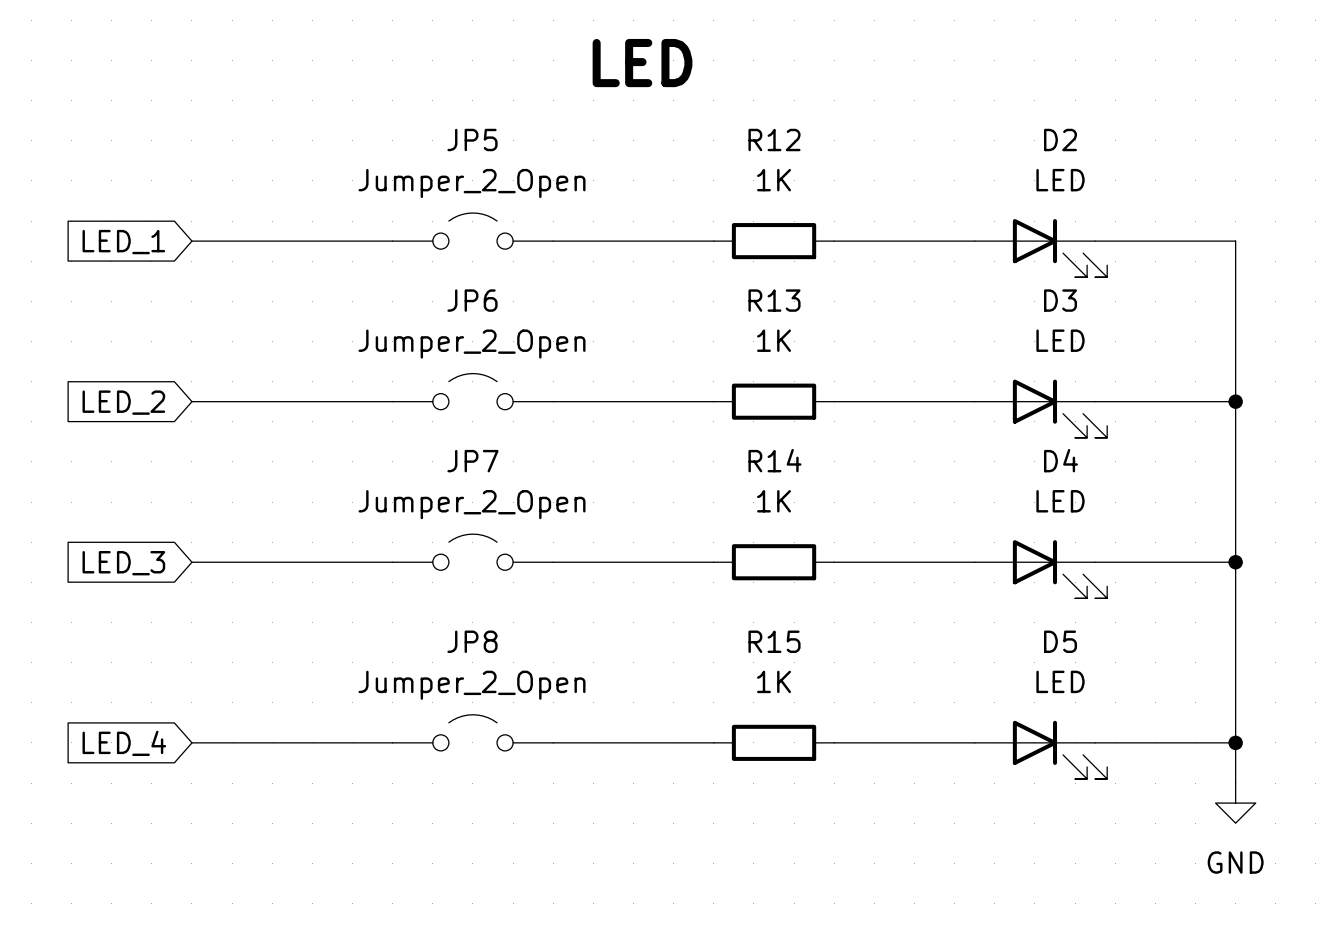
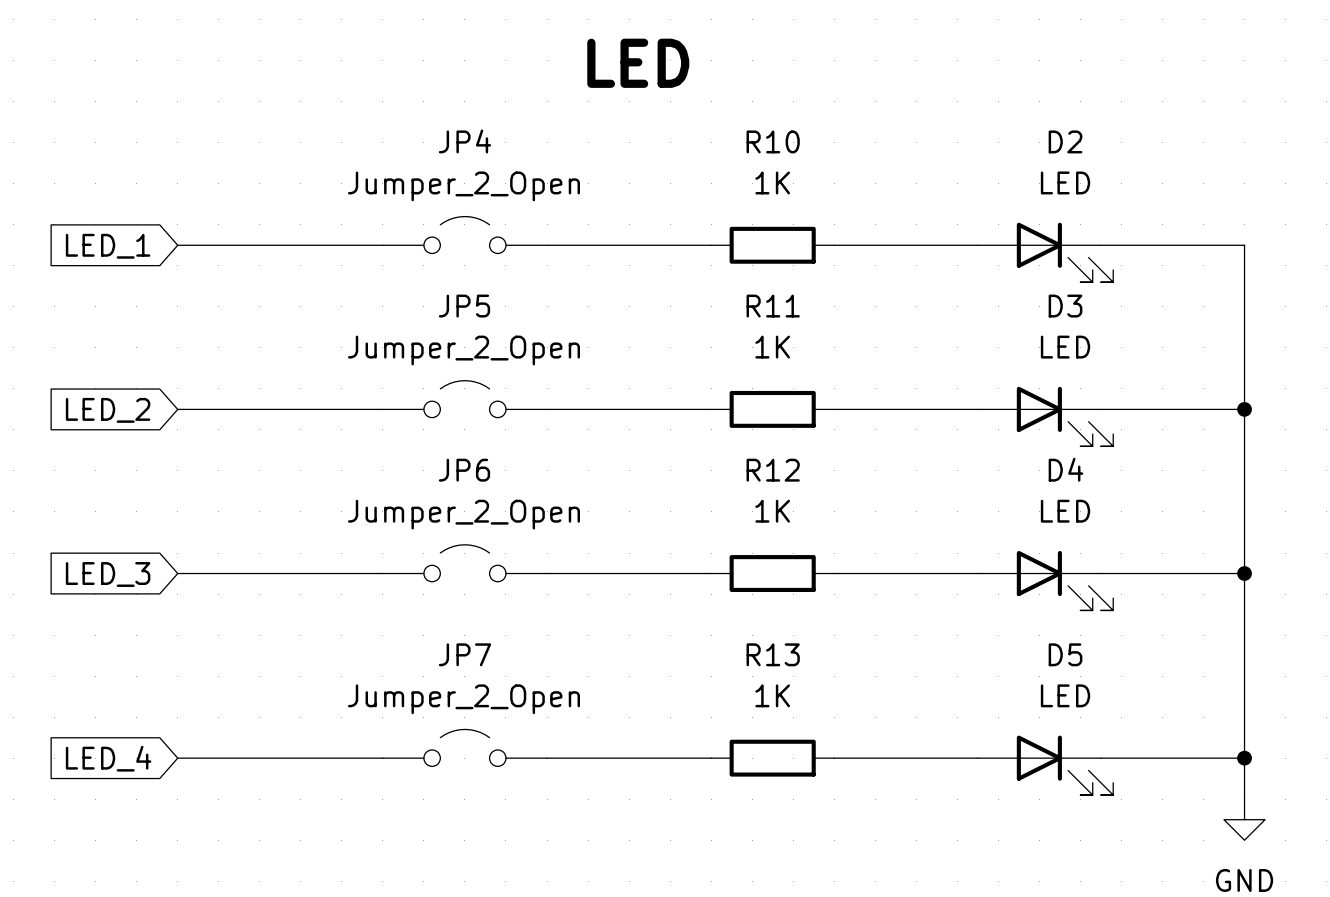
JP5 name: JP5 (472, 140) -> JP4 (464, 141)
R12 name: R12 (774, 140) -> R10 (773, 141)
JP6 name: JP6 (472, 300) -> JP5 (464, 306)
R13 name: R13 (774, 300) -> R11 (773, 306)
R14 name: R14 (774, 460) -> R12 (773, 470)
JP7 name: JP7 (472, 461) -> JP6 (464, 470)
JP8 name: JP8 (472, 641) -> JP7 (464, 654)
R15 name: R15 (774, 641) -> R13 (773, 654)

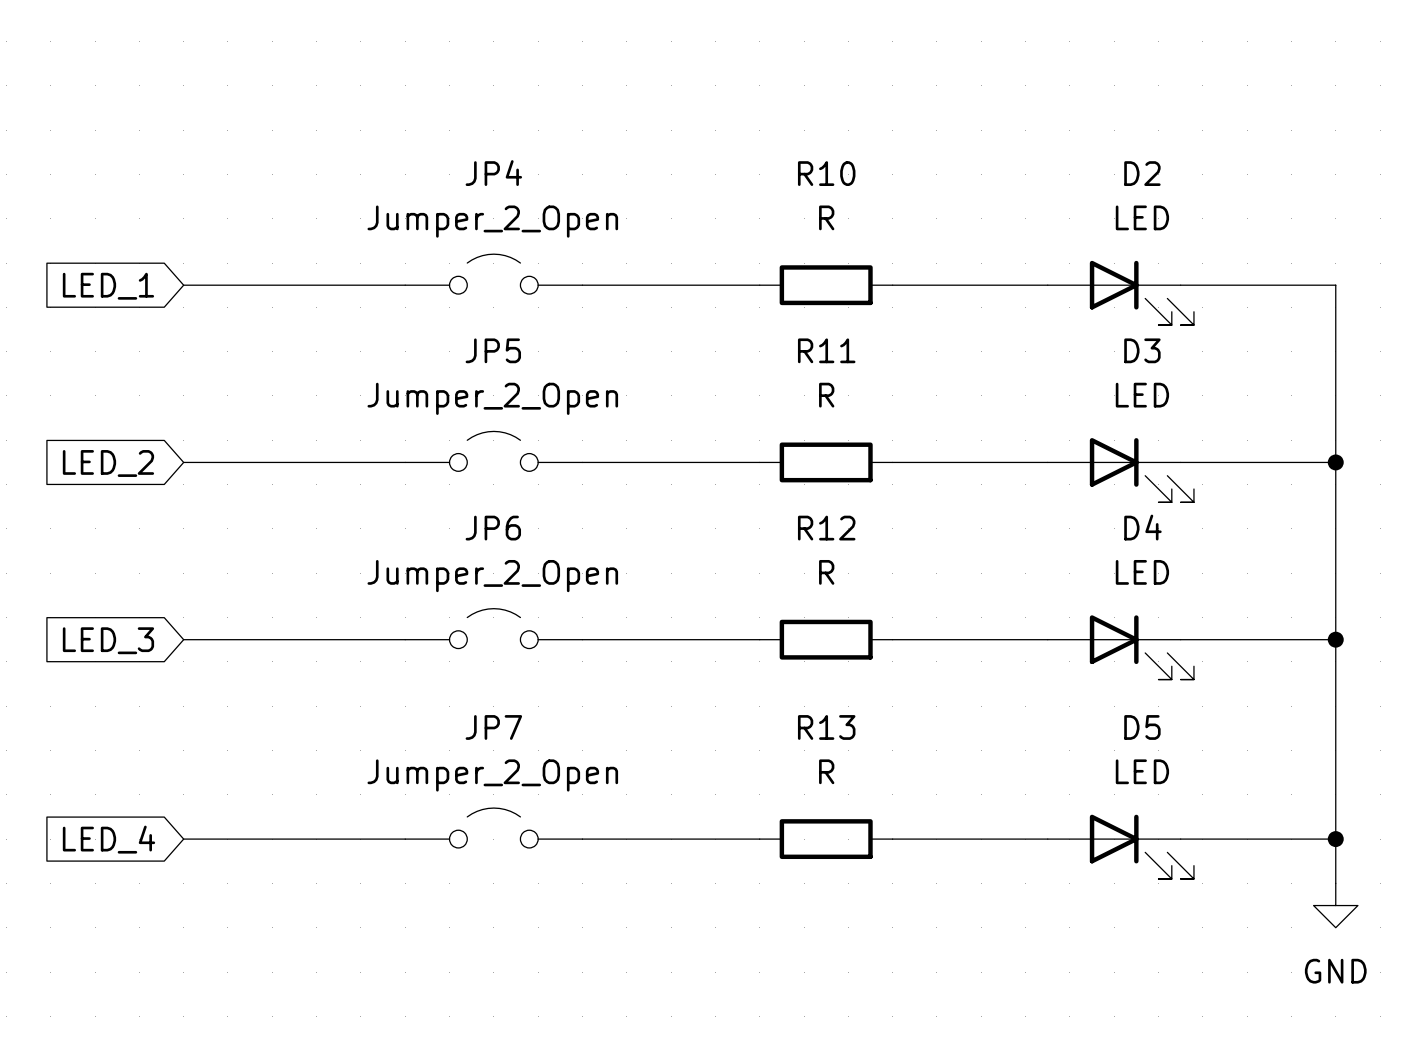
text: LED (638, 63) -> none
R10 value: 1K (772, 182) -> R (826, 217)
R11 value: 1K (772, 347) -> R (826, 395)
R12 value: 1K (772, 511) -> R (826, 572)
R13 value: 1K (772, 695) -> R (826, 771)

